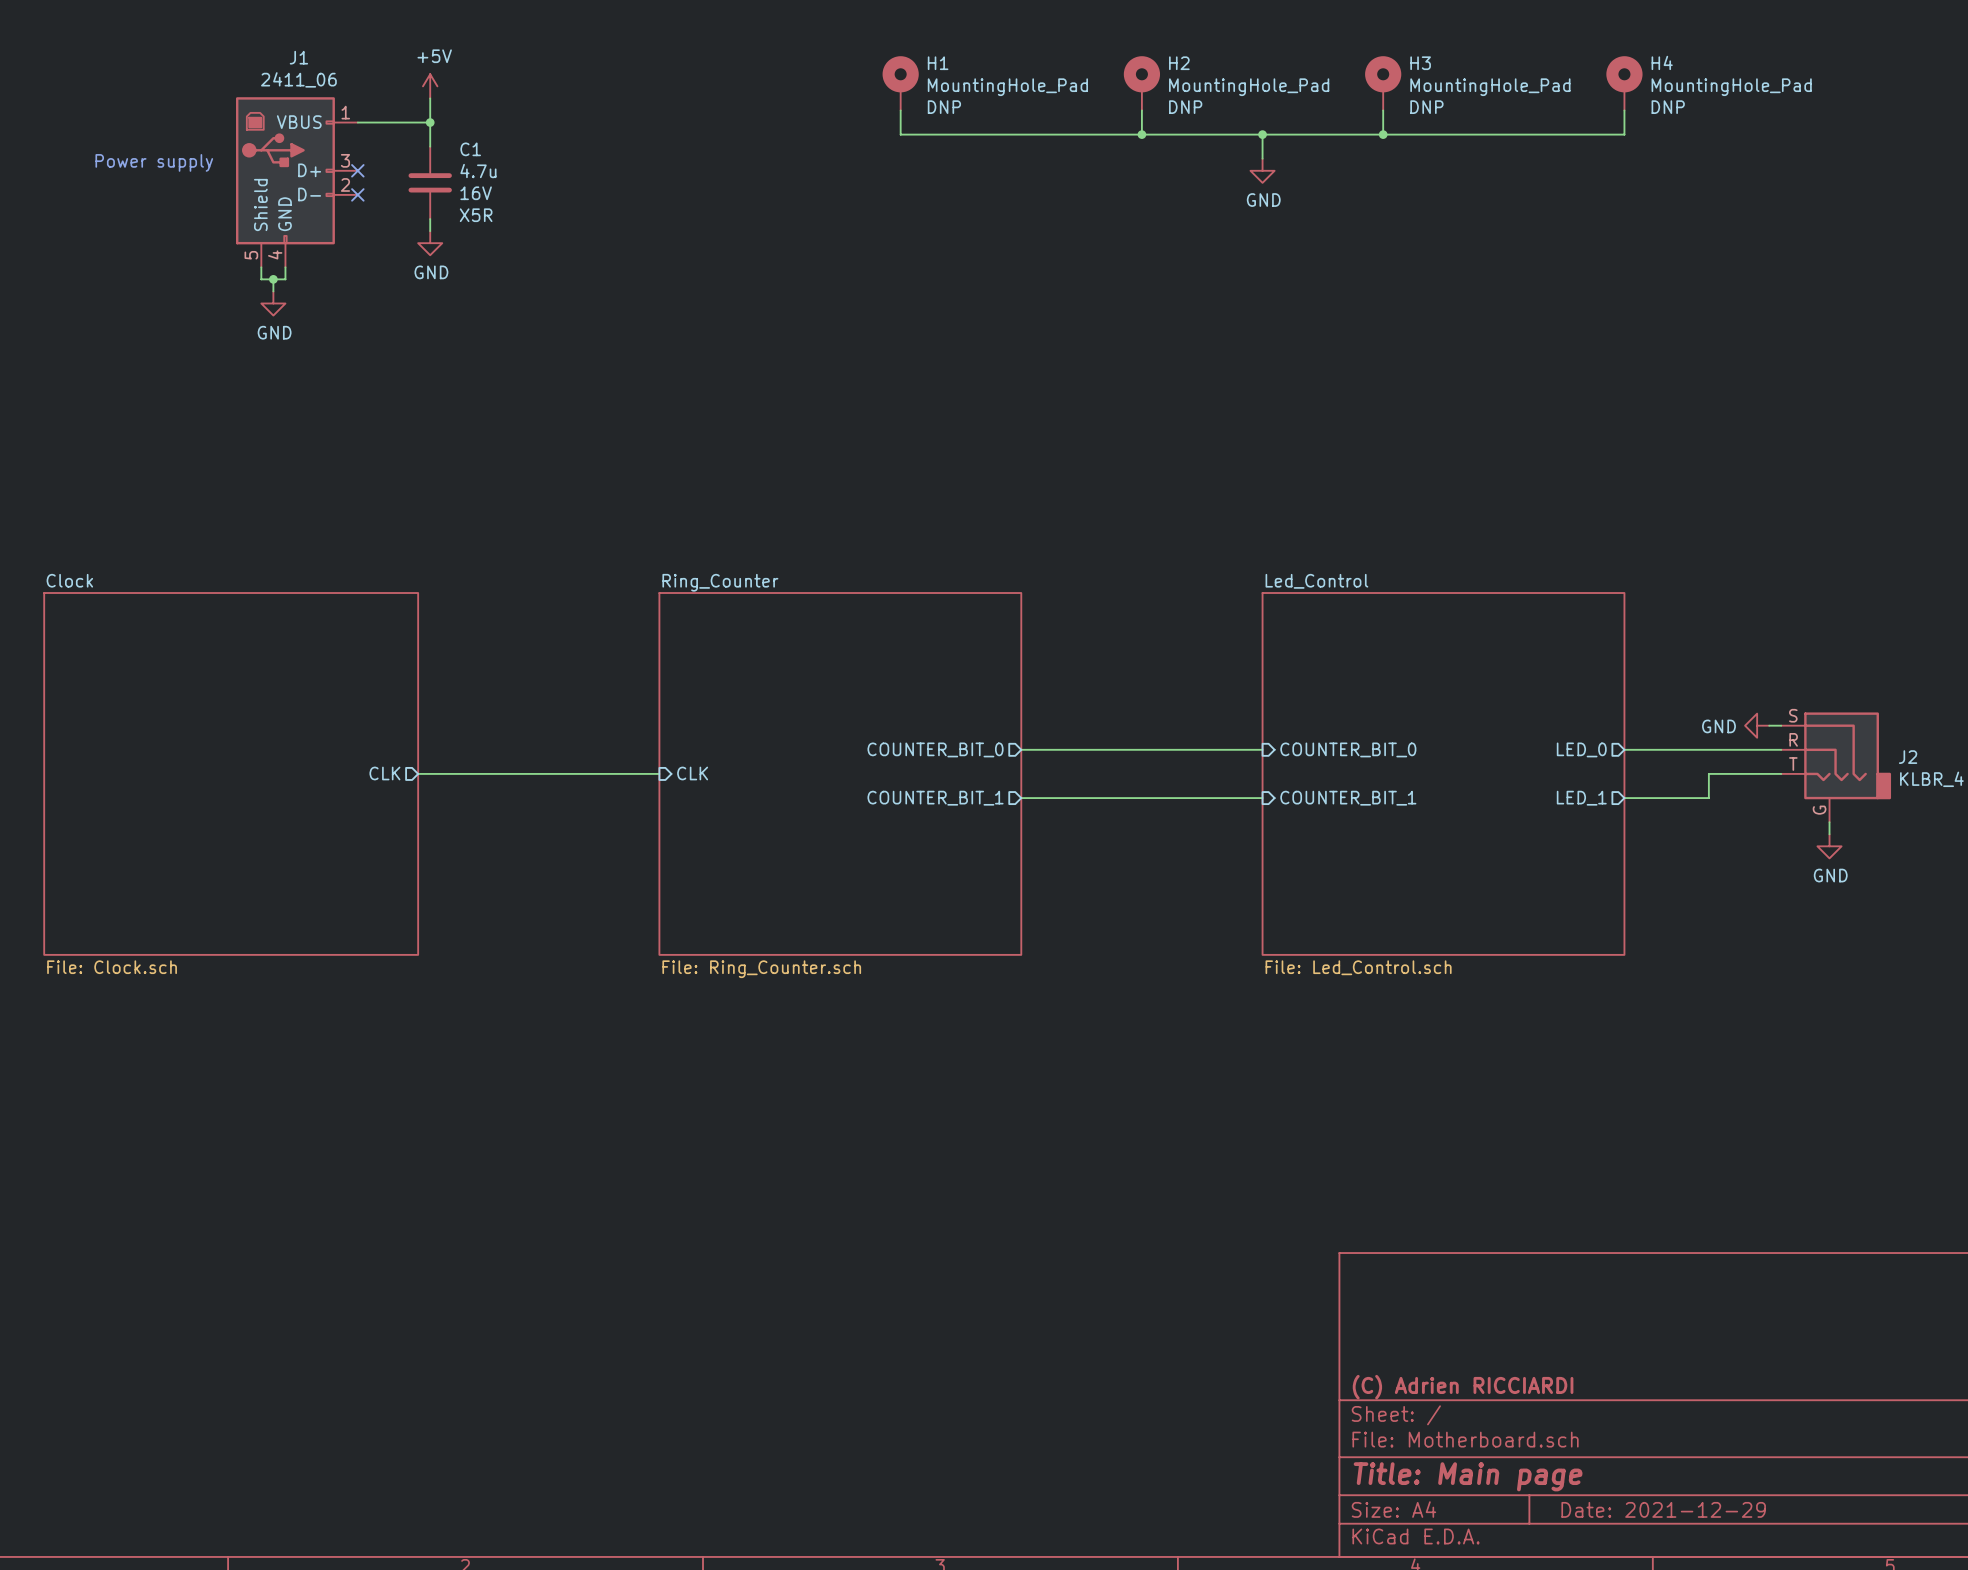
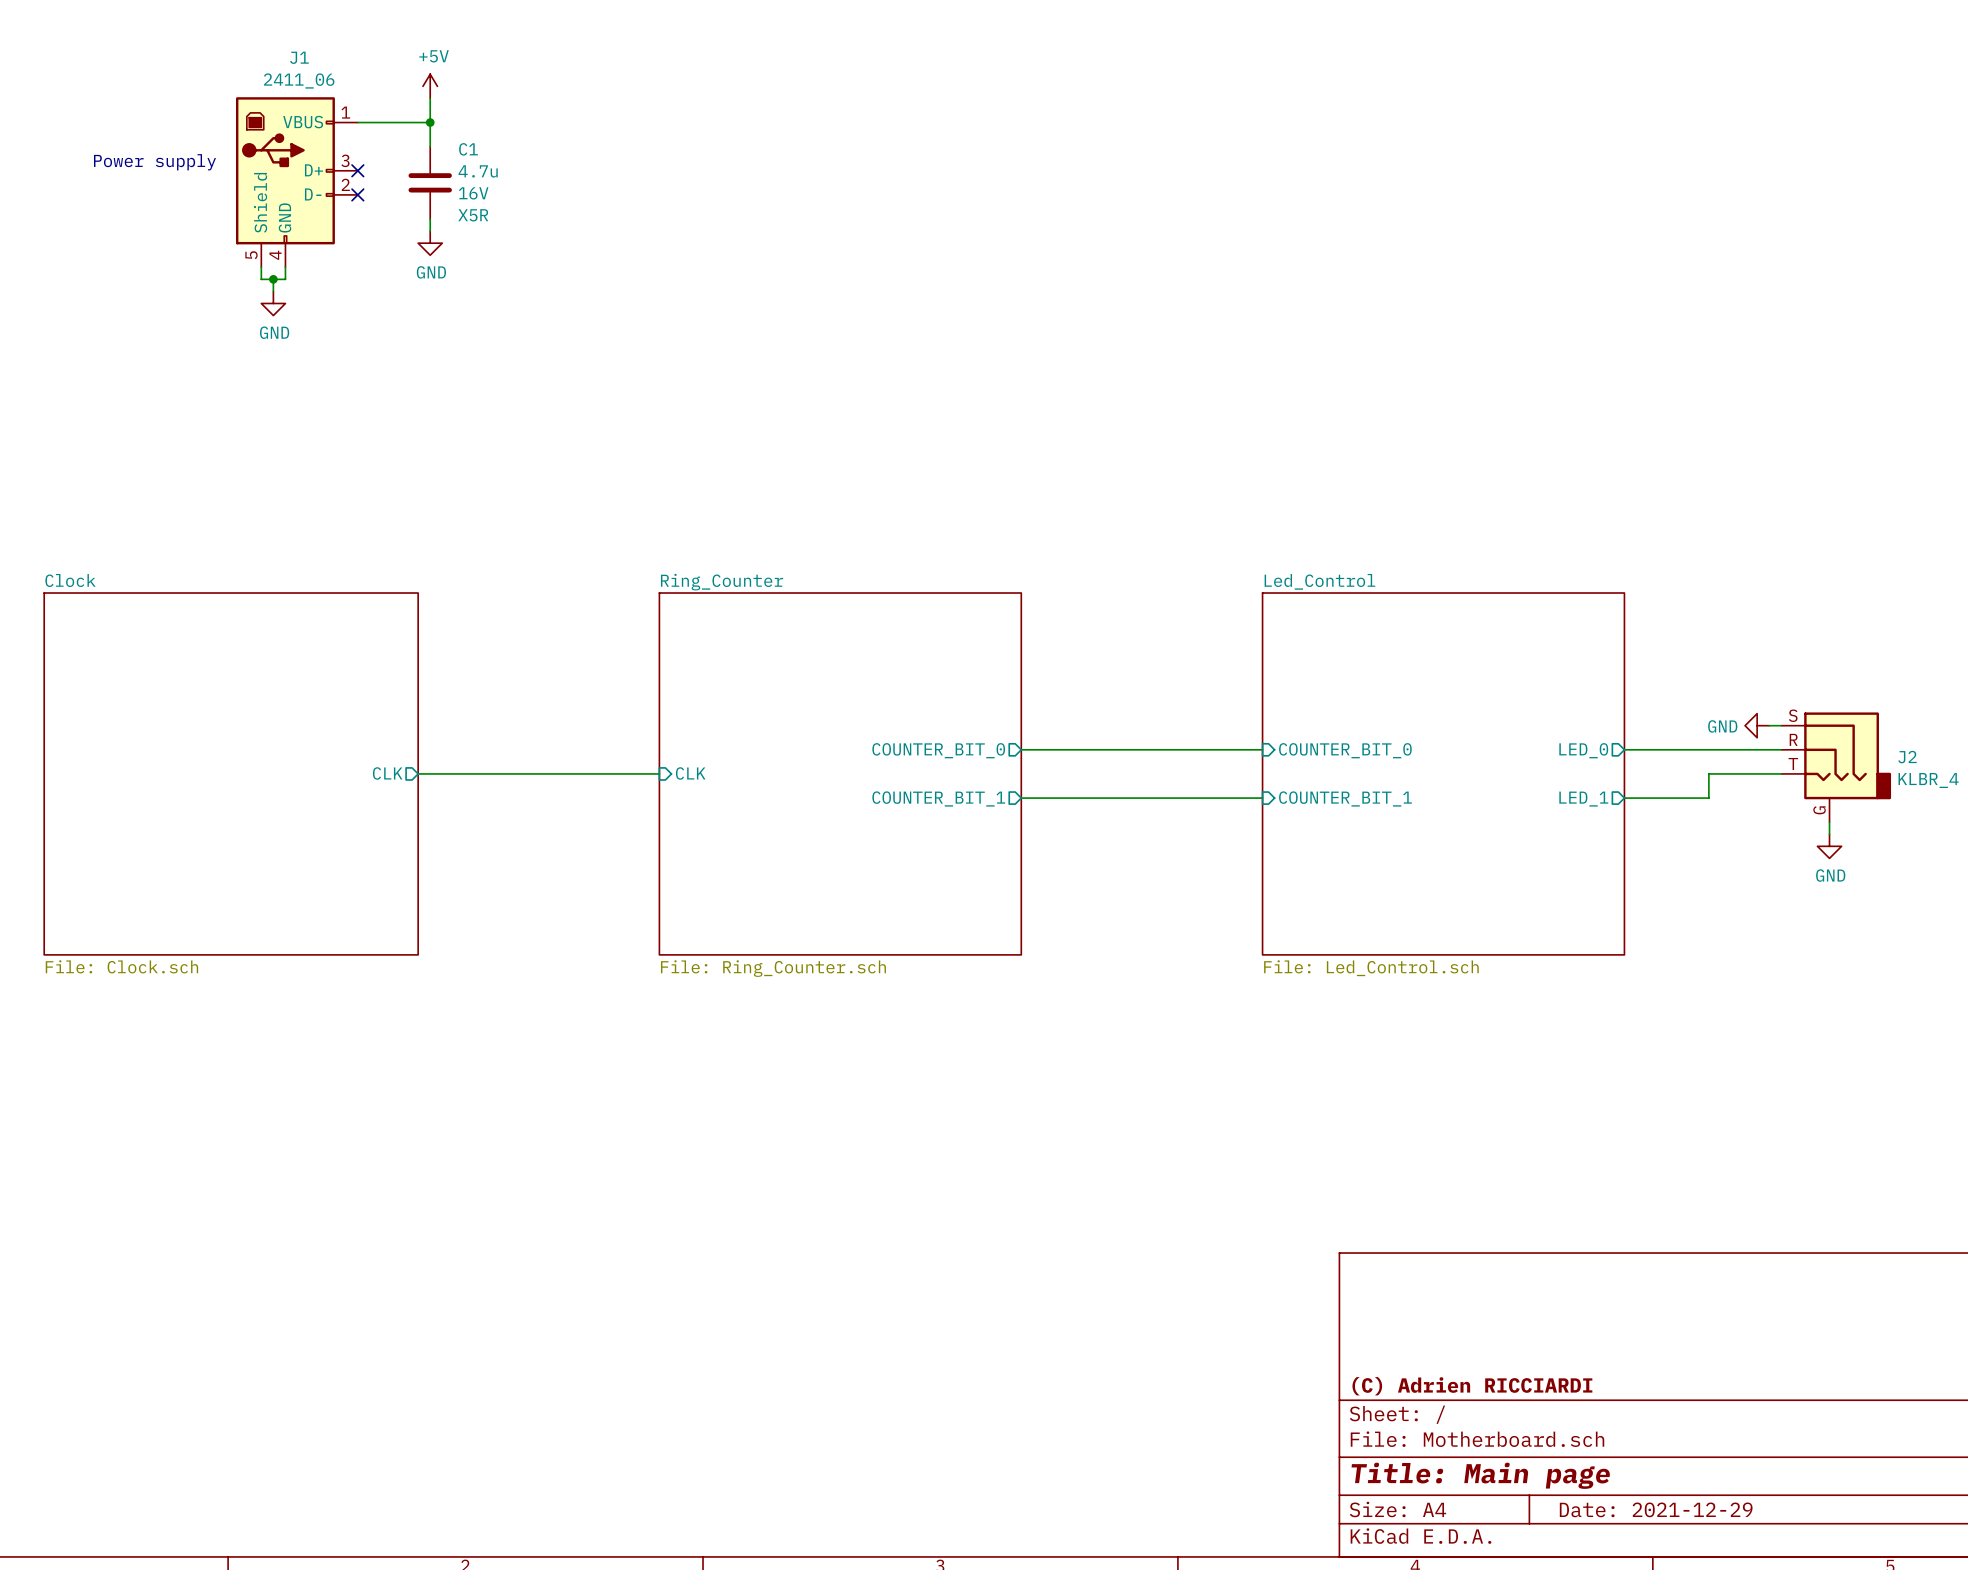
H1: MountingHole_Pad (900, 83) -> none
H2: MountingHole_Pad (1141, 83) -> none
H3: MountingHole_Pad (1383, 83) -> none
H4: MountingHole_Pad (1624, 83) -> none
wire: (900, 110) (900, 134) (1624, 134) (1624, 110) -> none
wire: (1141, 110) (1141, 134) -> none
wire: (1383, 110) (1383, 134) -> none
junction: (1141, 134) -> none
wire: (1262, 134) (1262, 158) -> none
junction: (1262, 134) -> none
junction: (1383, 134) -> none
power symbol: GND (1262, 170) -> none

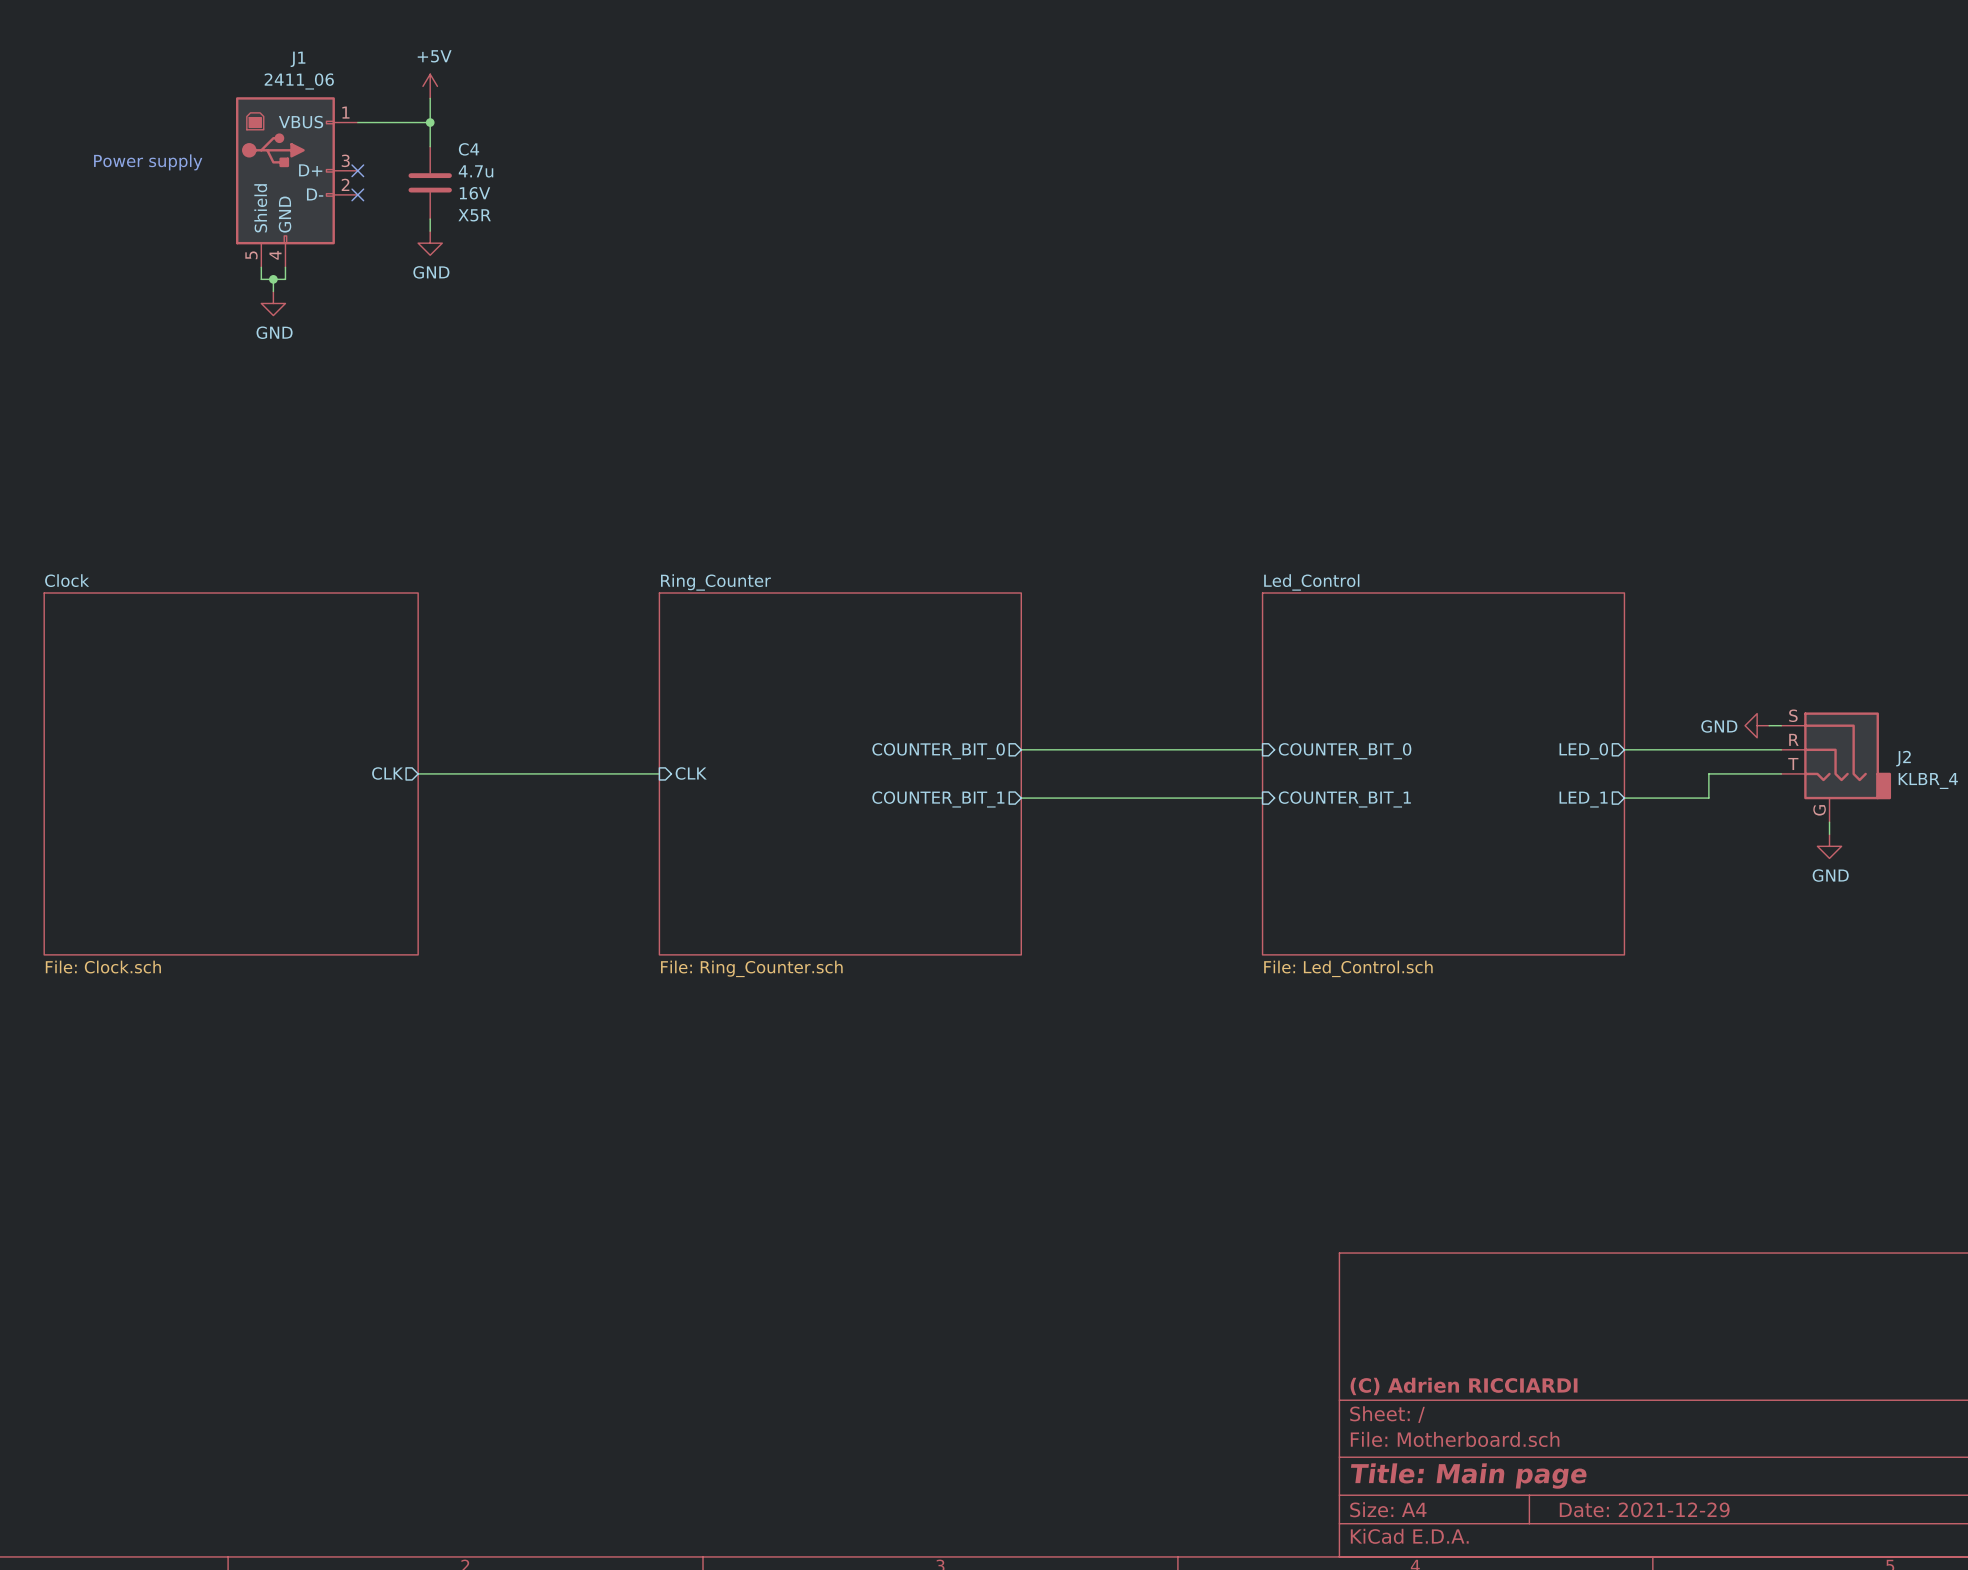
C1 name: C1 (468, 149) -> C4 (468, 149)

